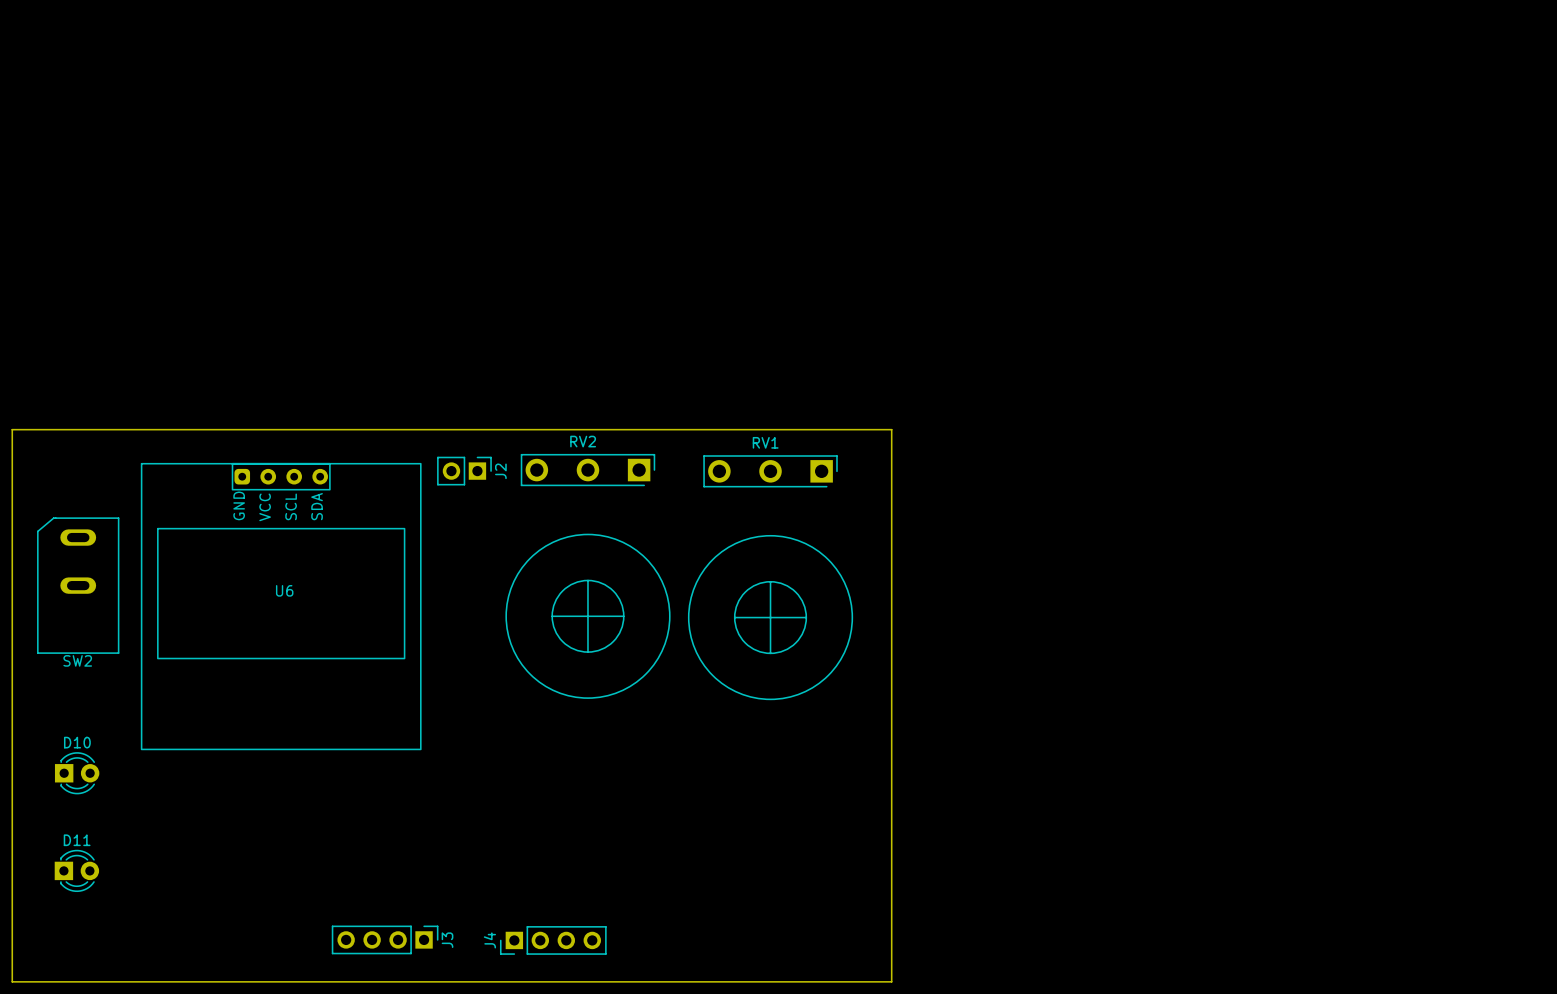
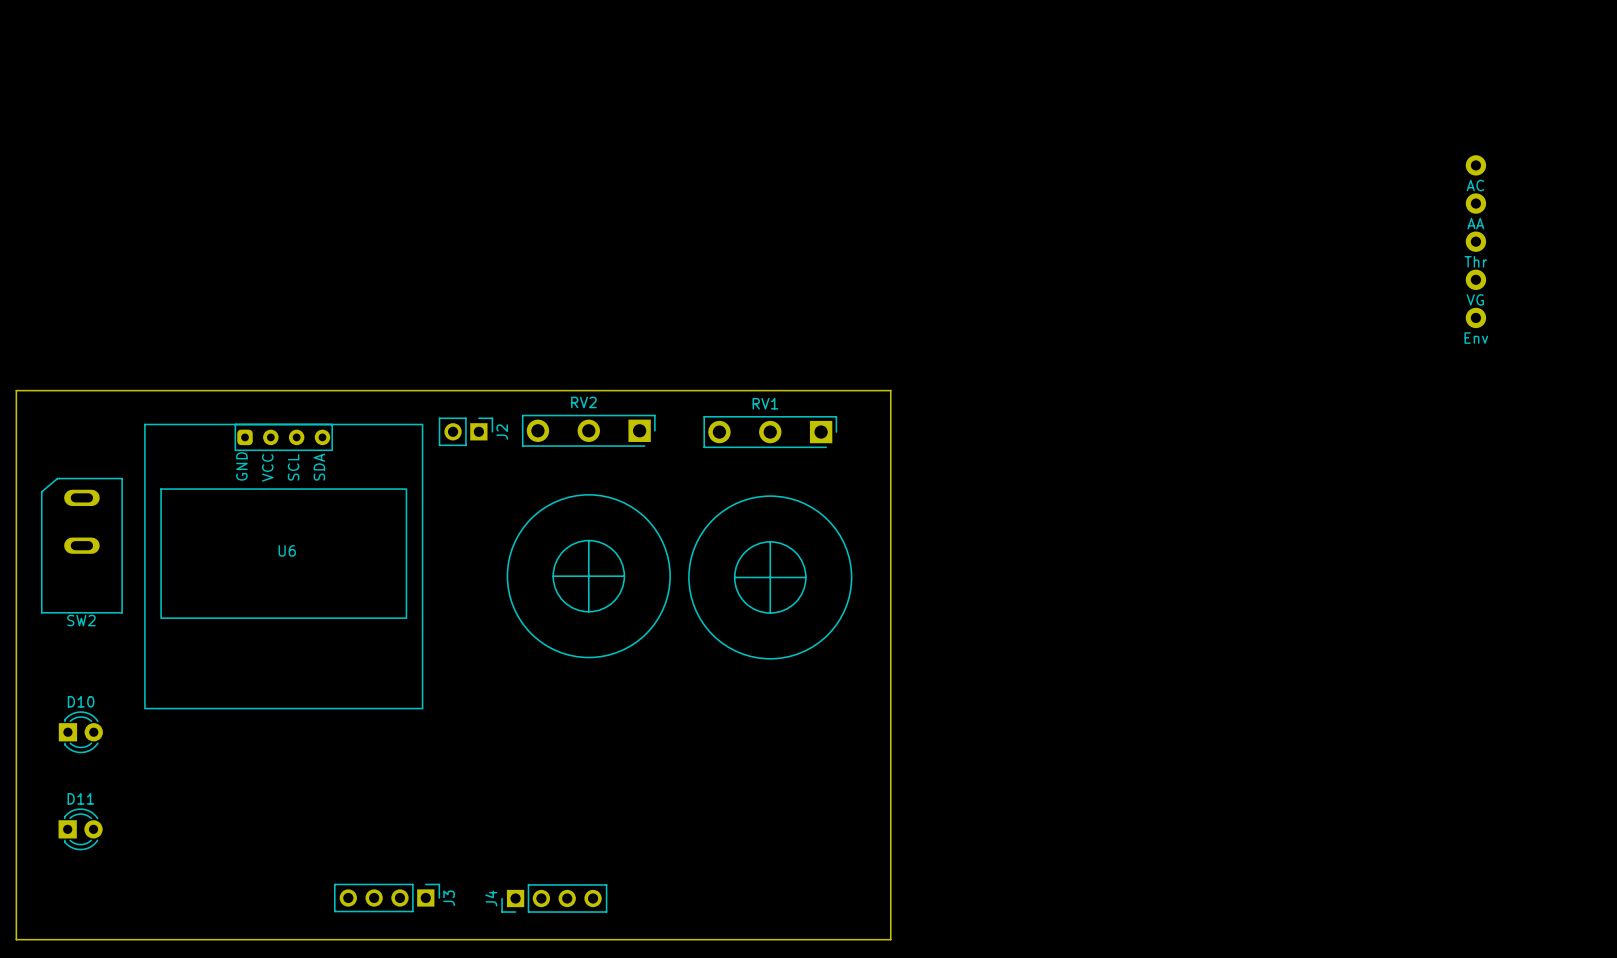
part: none -> AC (1475, 165)
part: none -> AA (1475, 203)
part: none -> Thr (1475, 241)
part: none -> VG (1475, 279)
part: none -> Env (1475, 317)

